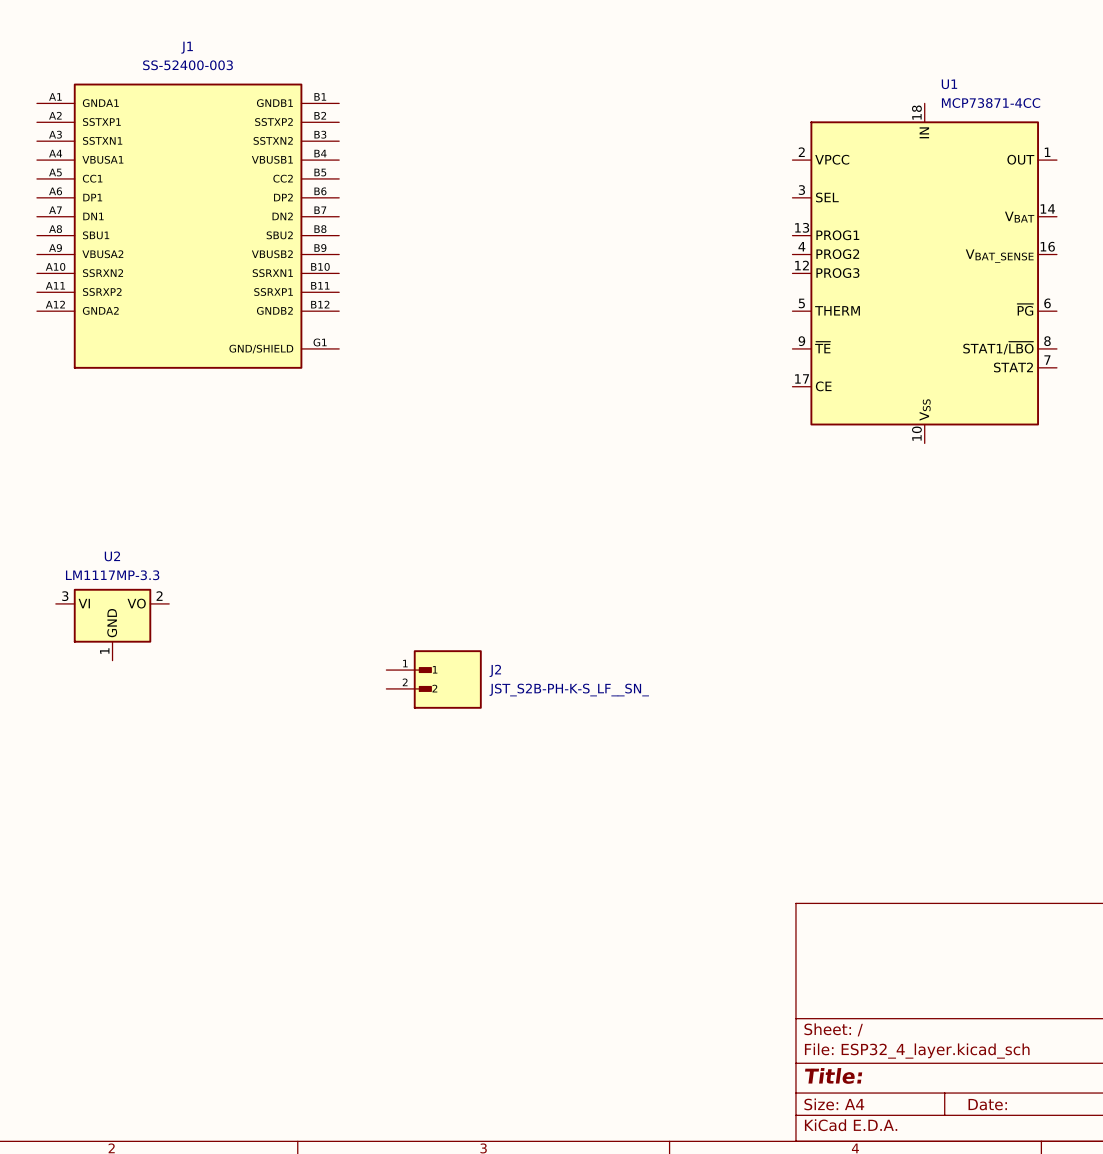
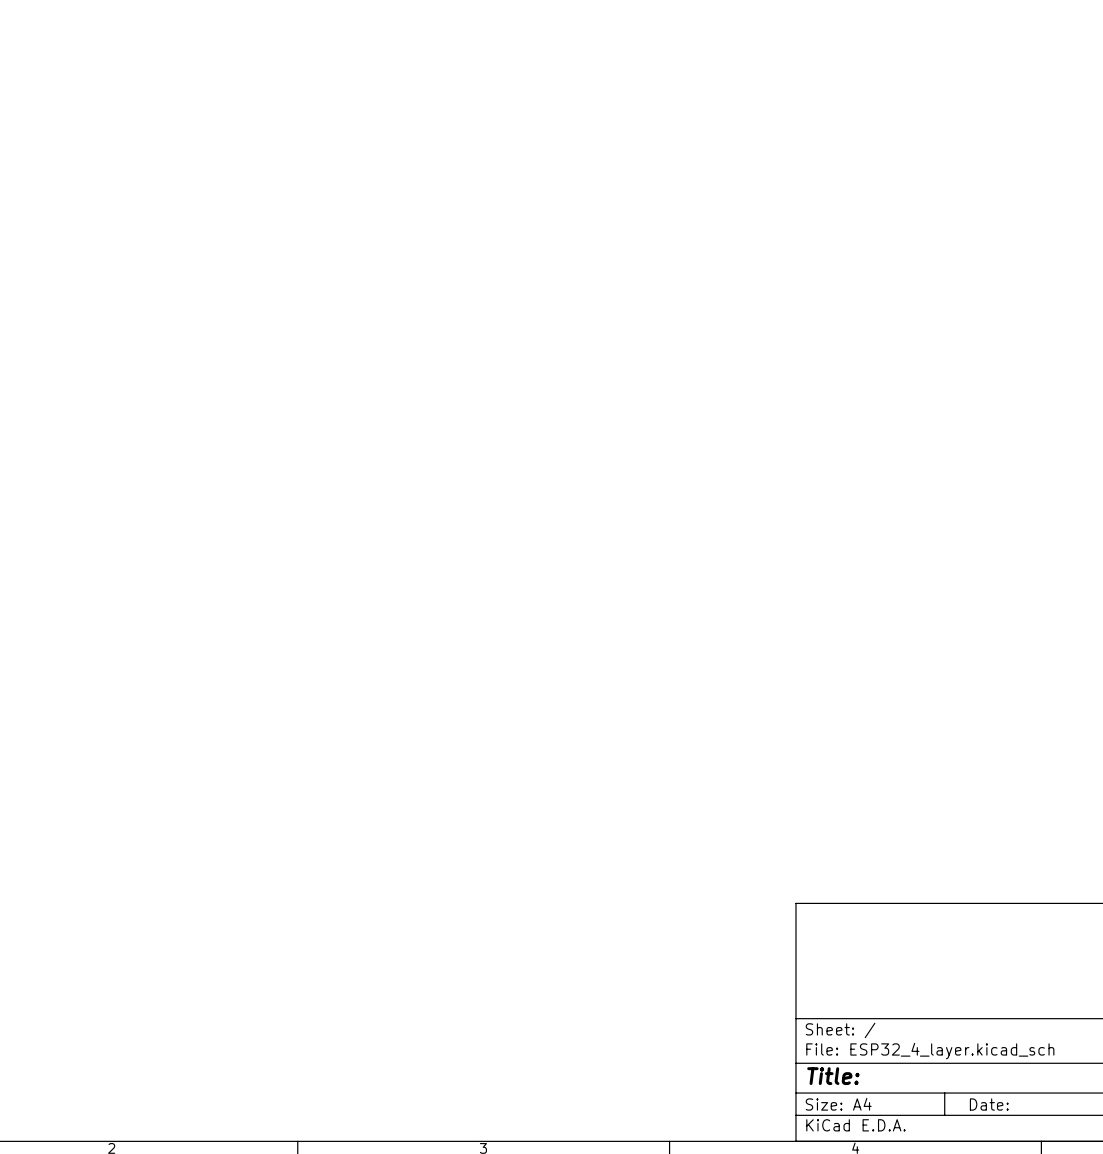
J1: SS-52400-003 (188, 226) -> none
U1: MCP73871-4CC (924, 273) -> none
U2: LM1117MP-3.3 (112, 624) -> none
J2: JST_S2B-PH-K-S_LF__SN_ (434, 679) -> none

